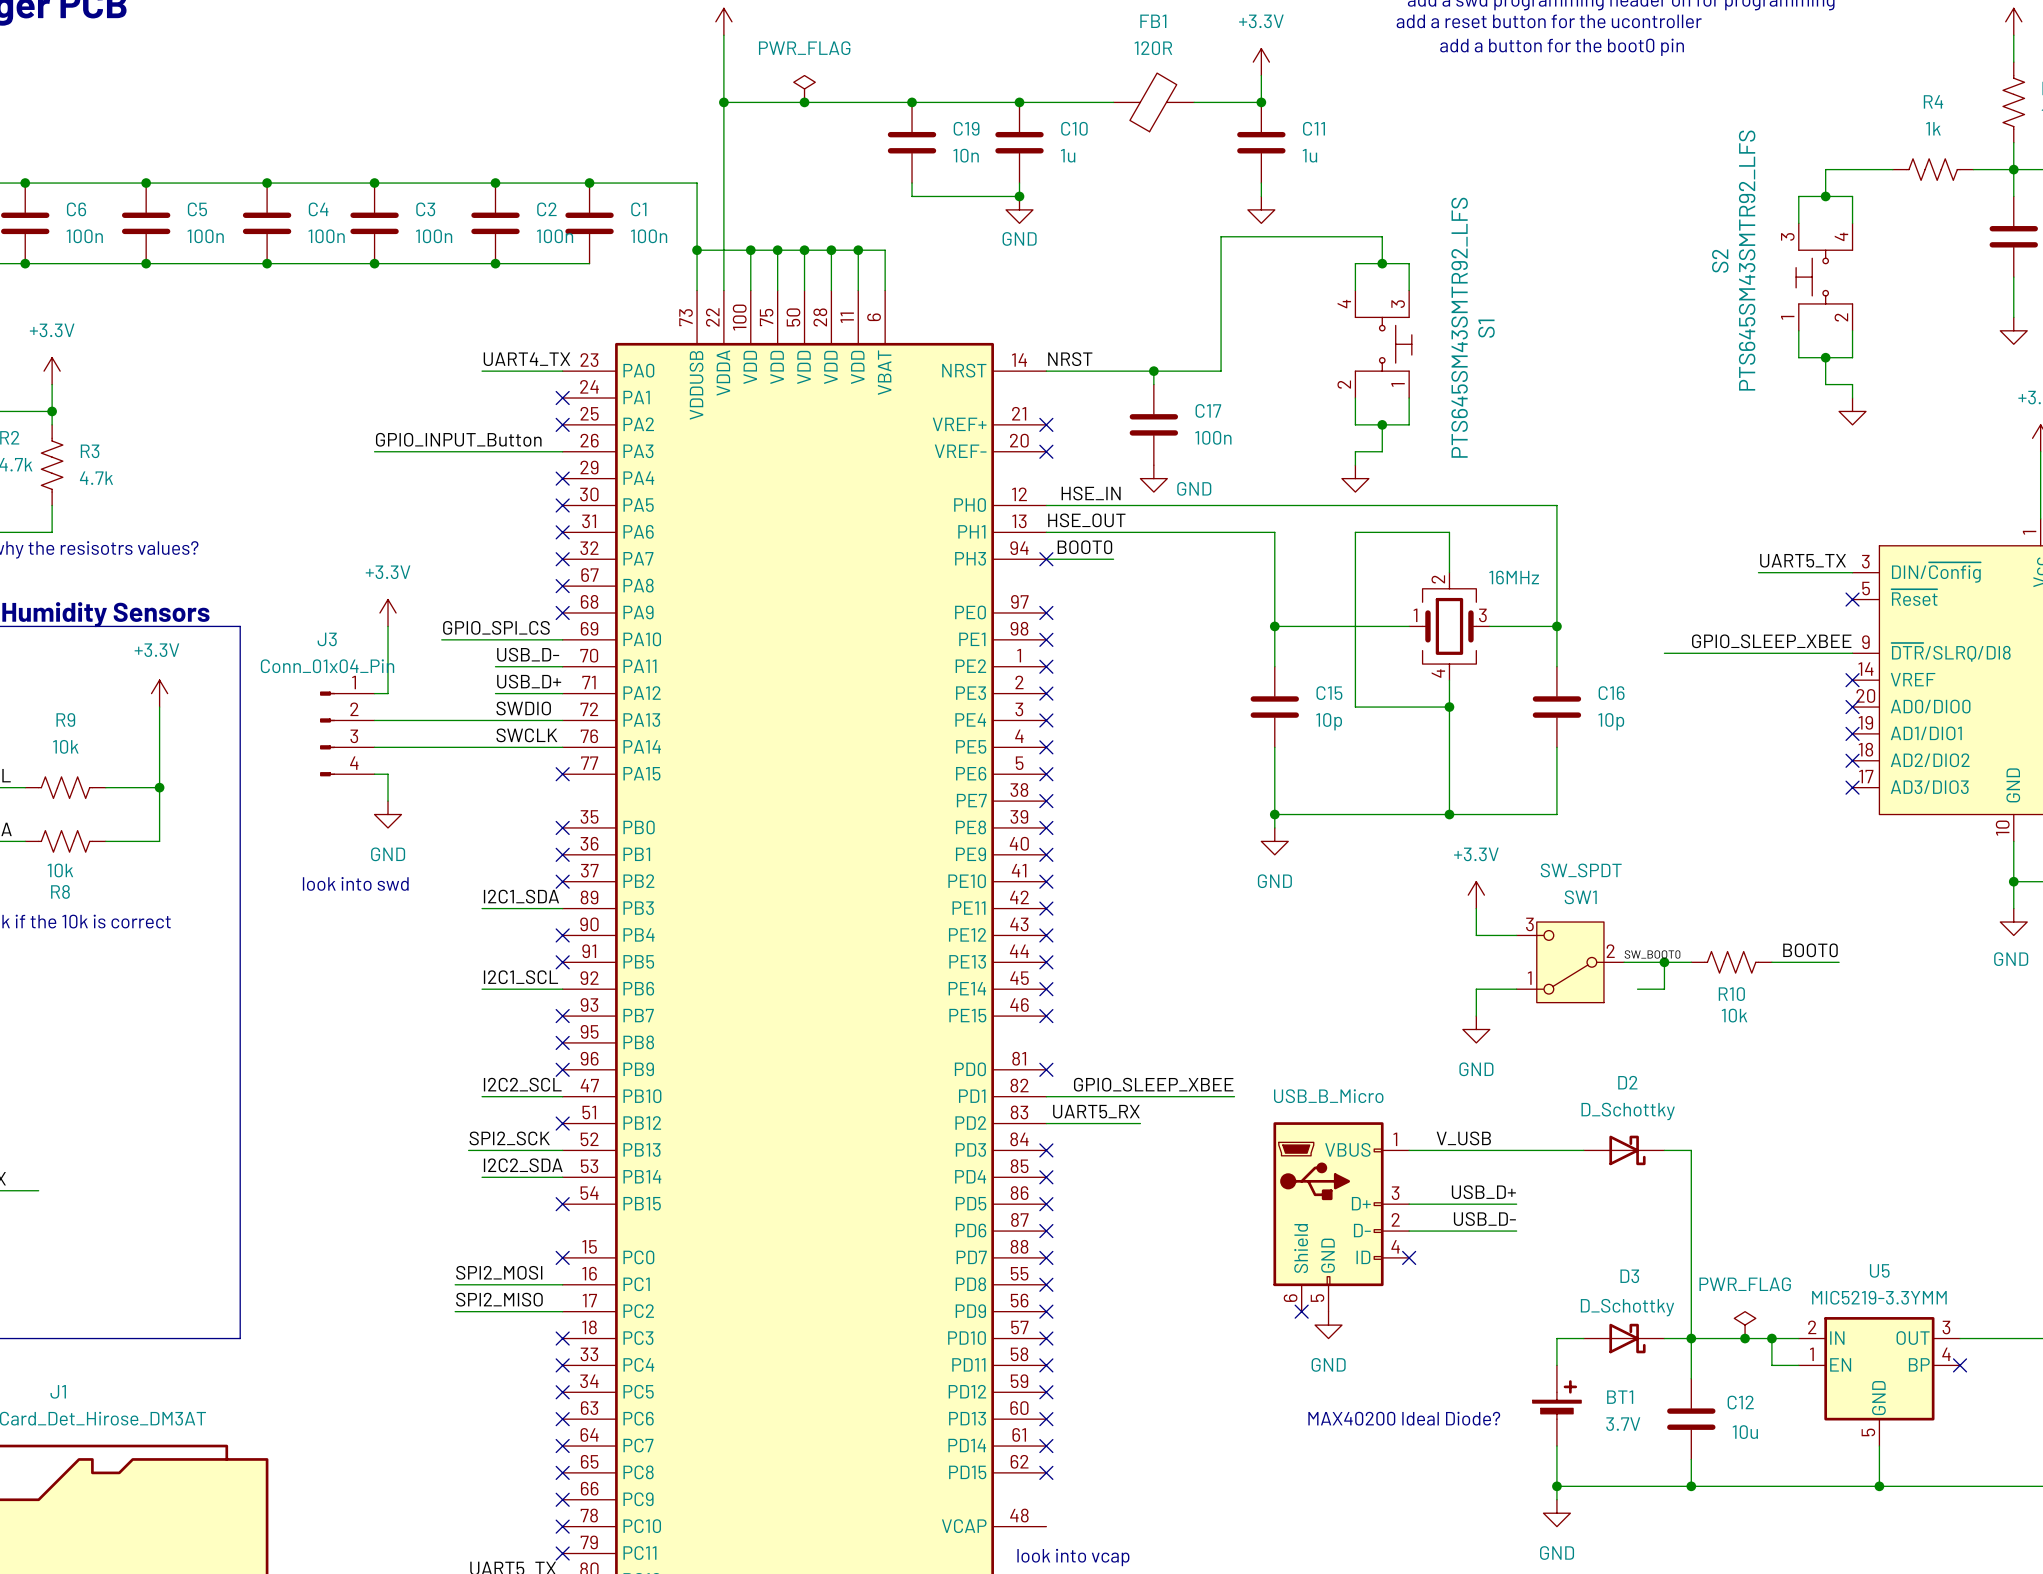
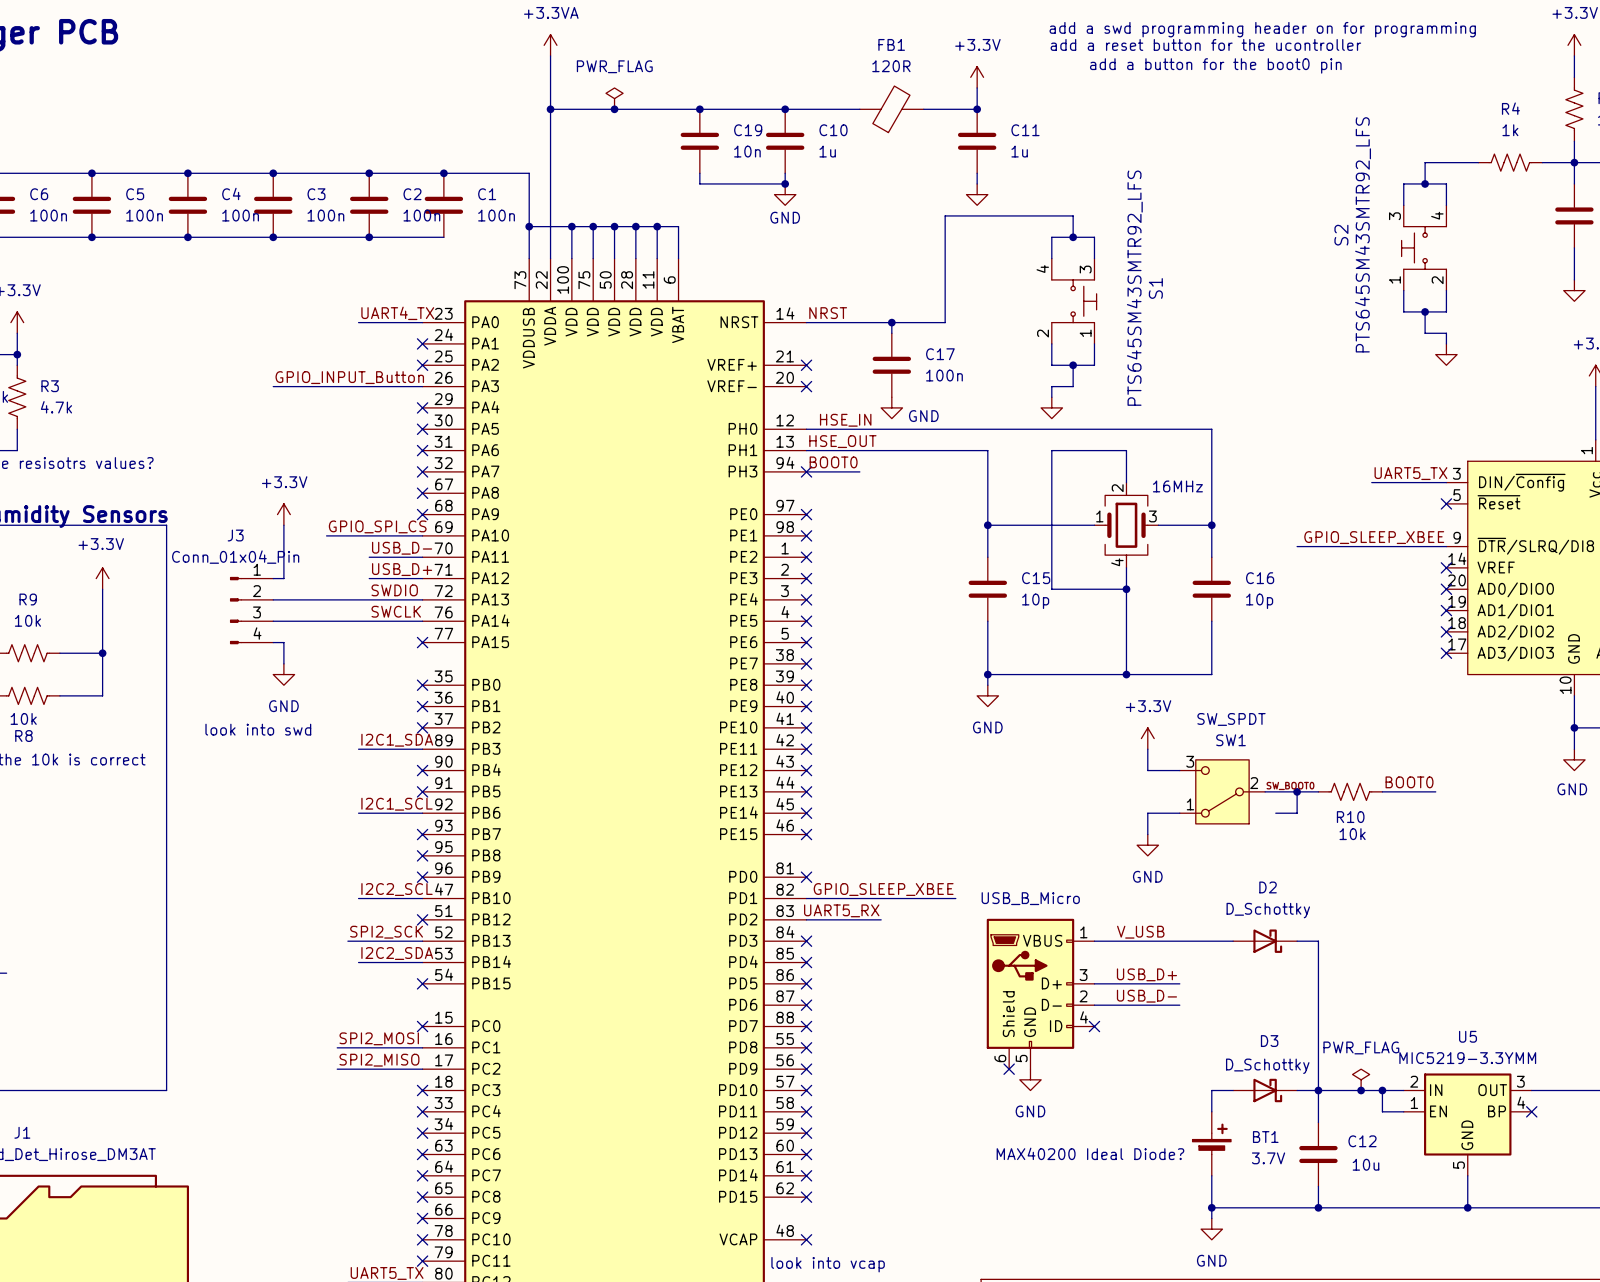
no-connect mark: none -> (806, 1239)

